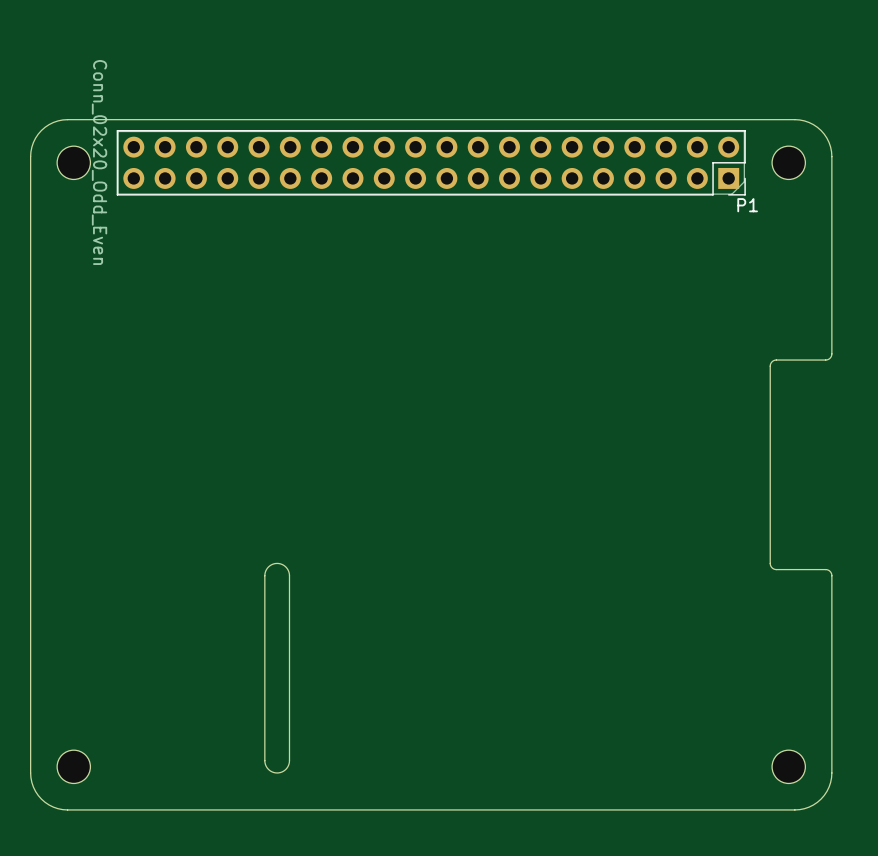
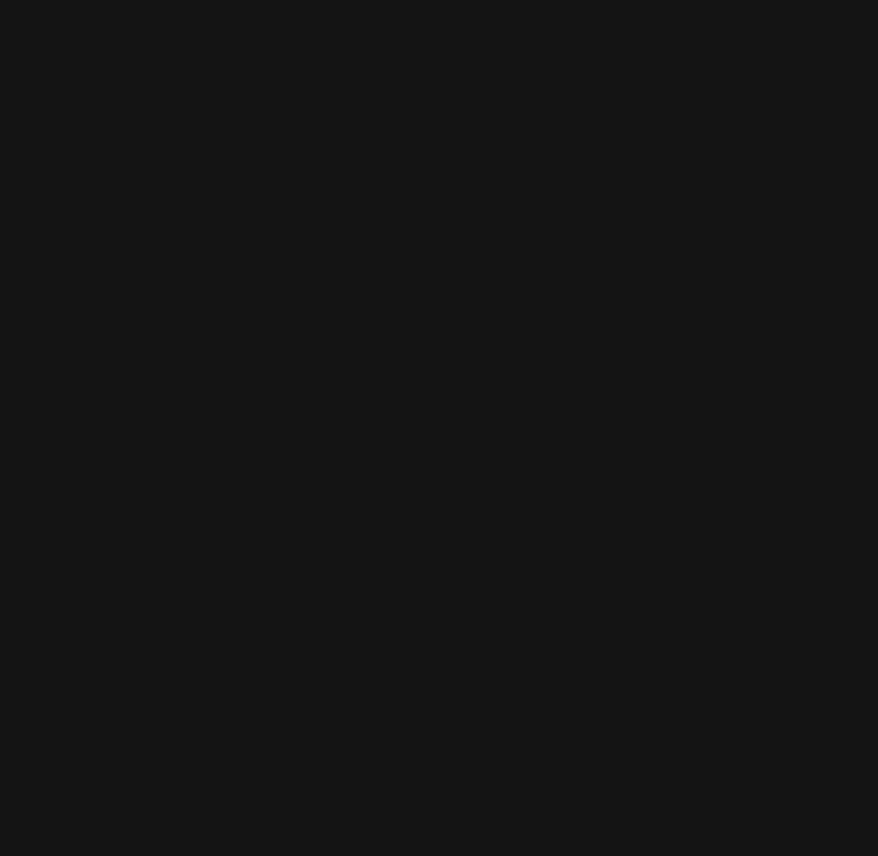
board edge: (794, 119) (67, 119) (53, 122) (41, 130) (33, 142) (30, 156) (30, 772) (33, 787) (41, 799) (53, 807) (67, 809) (794, 809) (809, 807) (821, 799) (829, 787) (831, 772) (831, 574) (826, 569) (775, 569) (772, 567) (770, 563) (770, 364) (775, 360) (826, 359) (830, 358) (831, 353) (831, 151) (826, 138) (817, 127) (809, 122) (794, 119) -> none
part: (73, 162) -> none
P1: Conn_02x20_Odd_Even (431, 162) -> none
part: (788, 162) -> none
board edge: (289, 575) (289, 762) (284, 770) (275, 772) (267, 768) (264, 760) (264, 574) (269, 565) (278, 563) (286, 568) (289, 575) -> none
part: (73, 766) -> none
part: (788, 766) -> none

